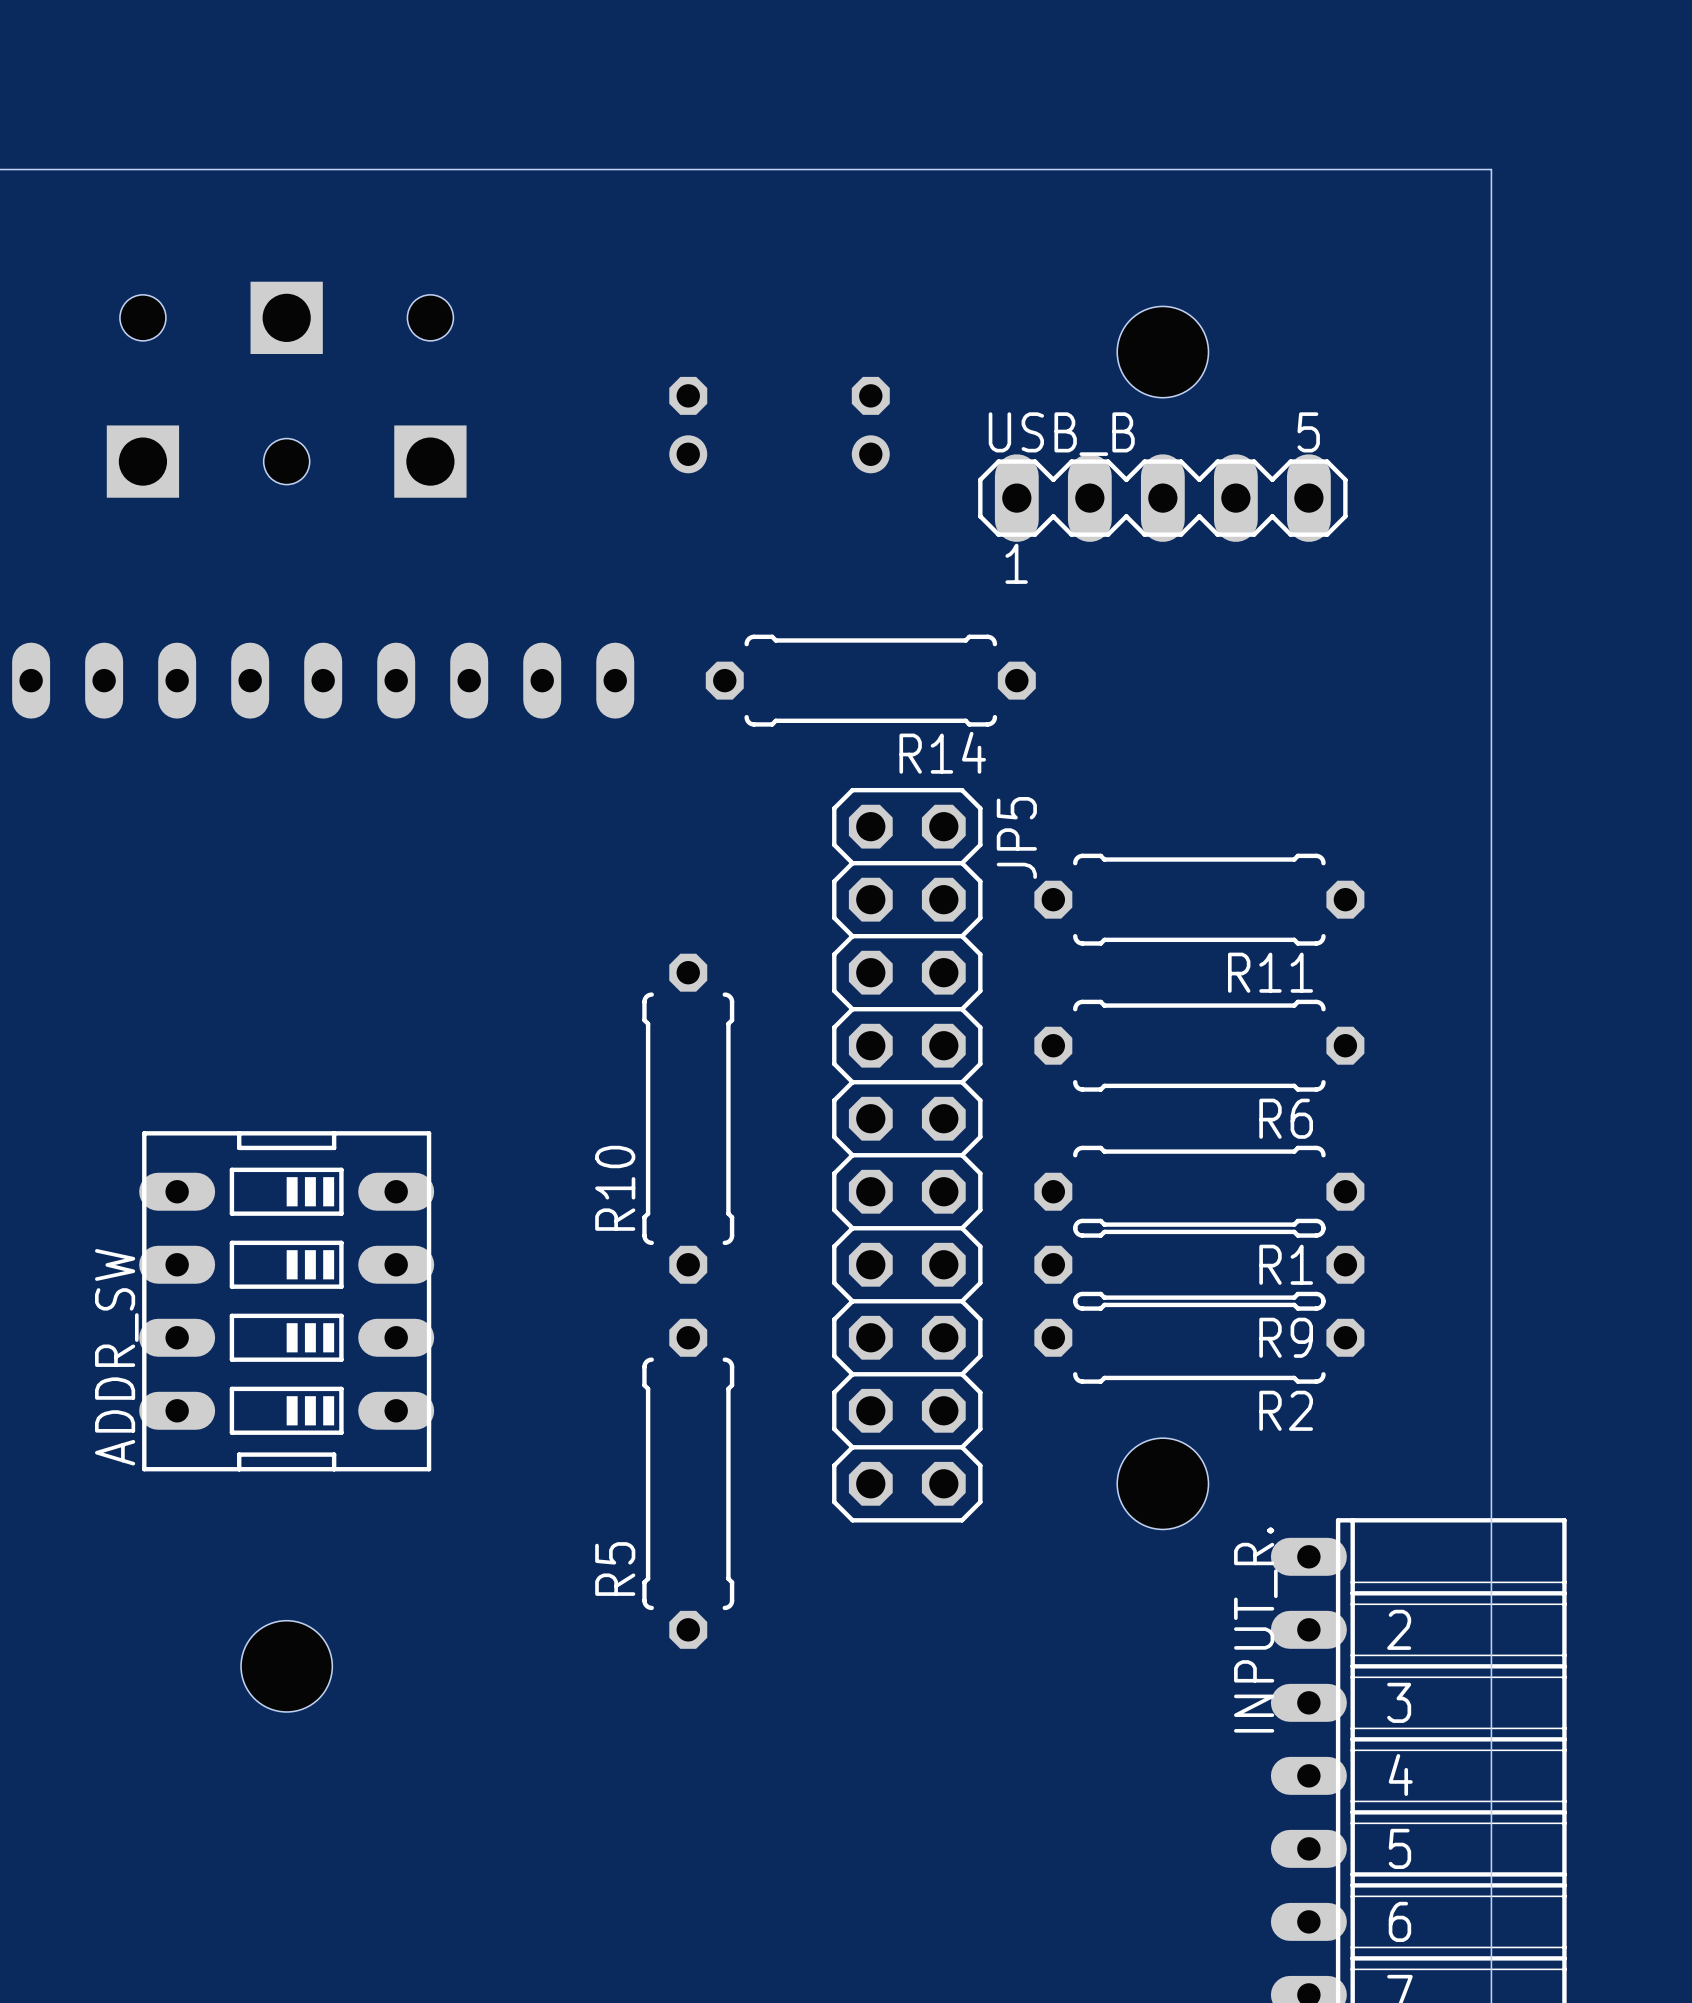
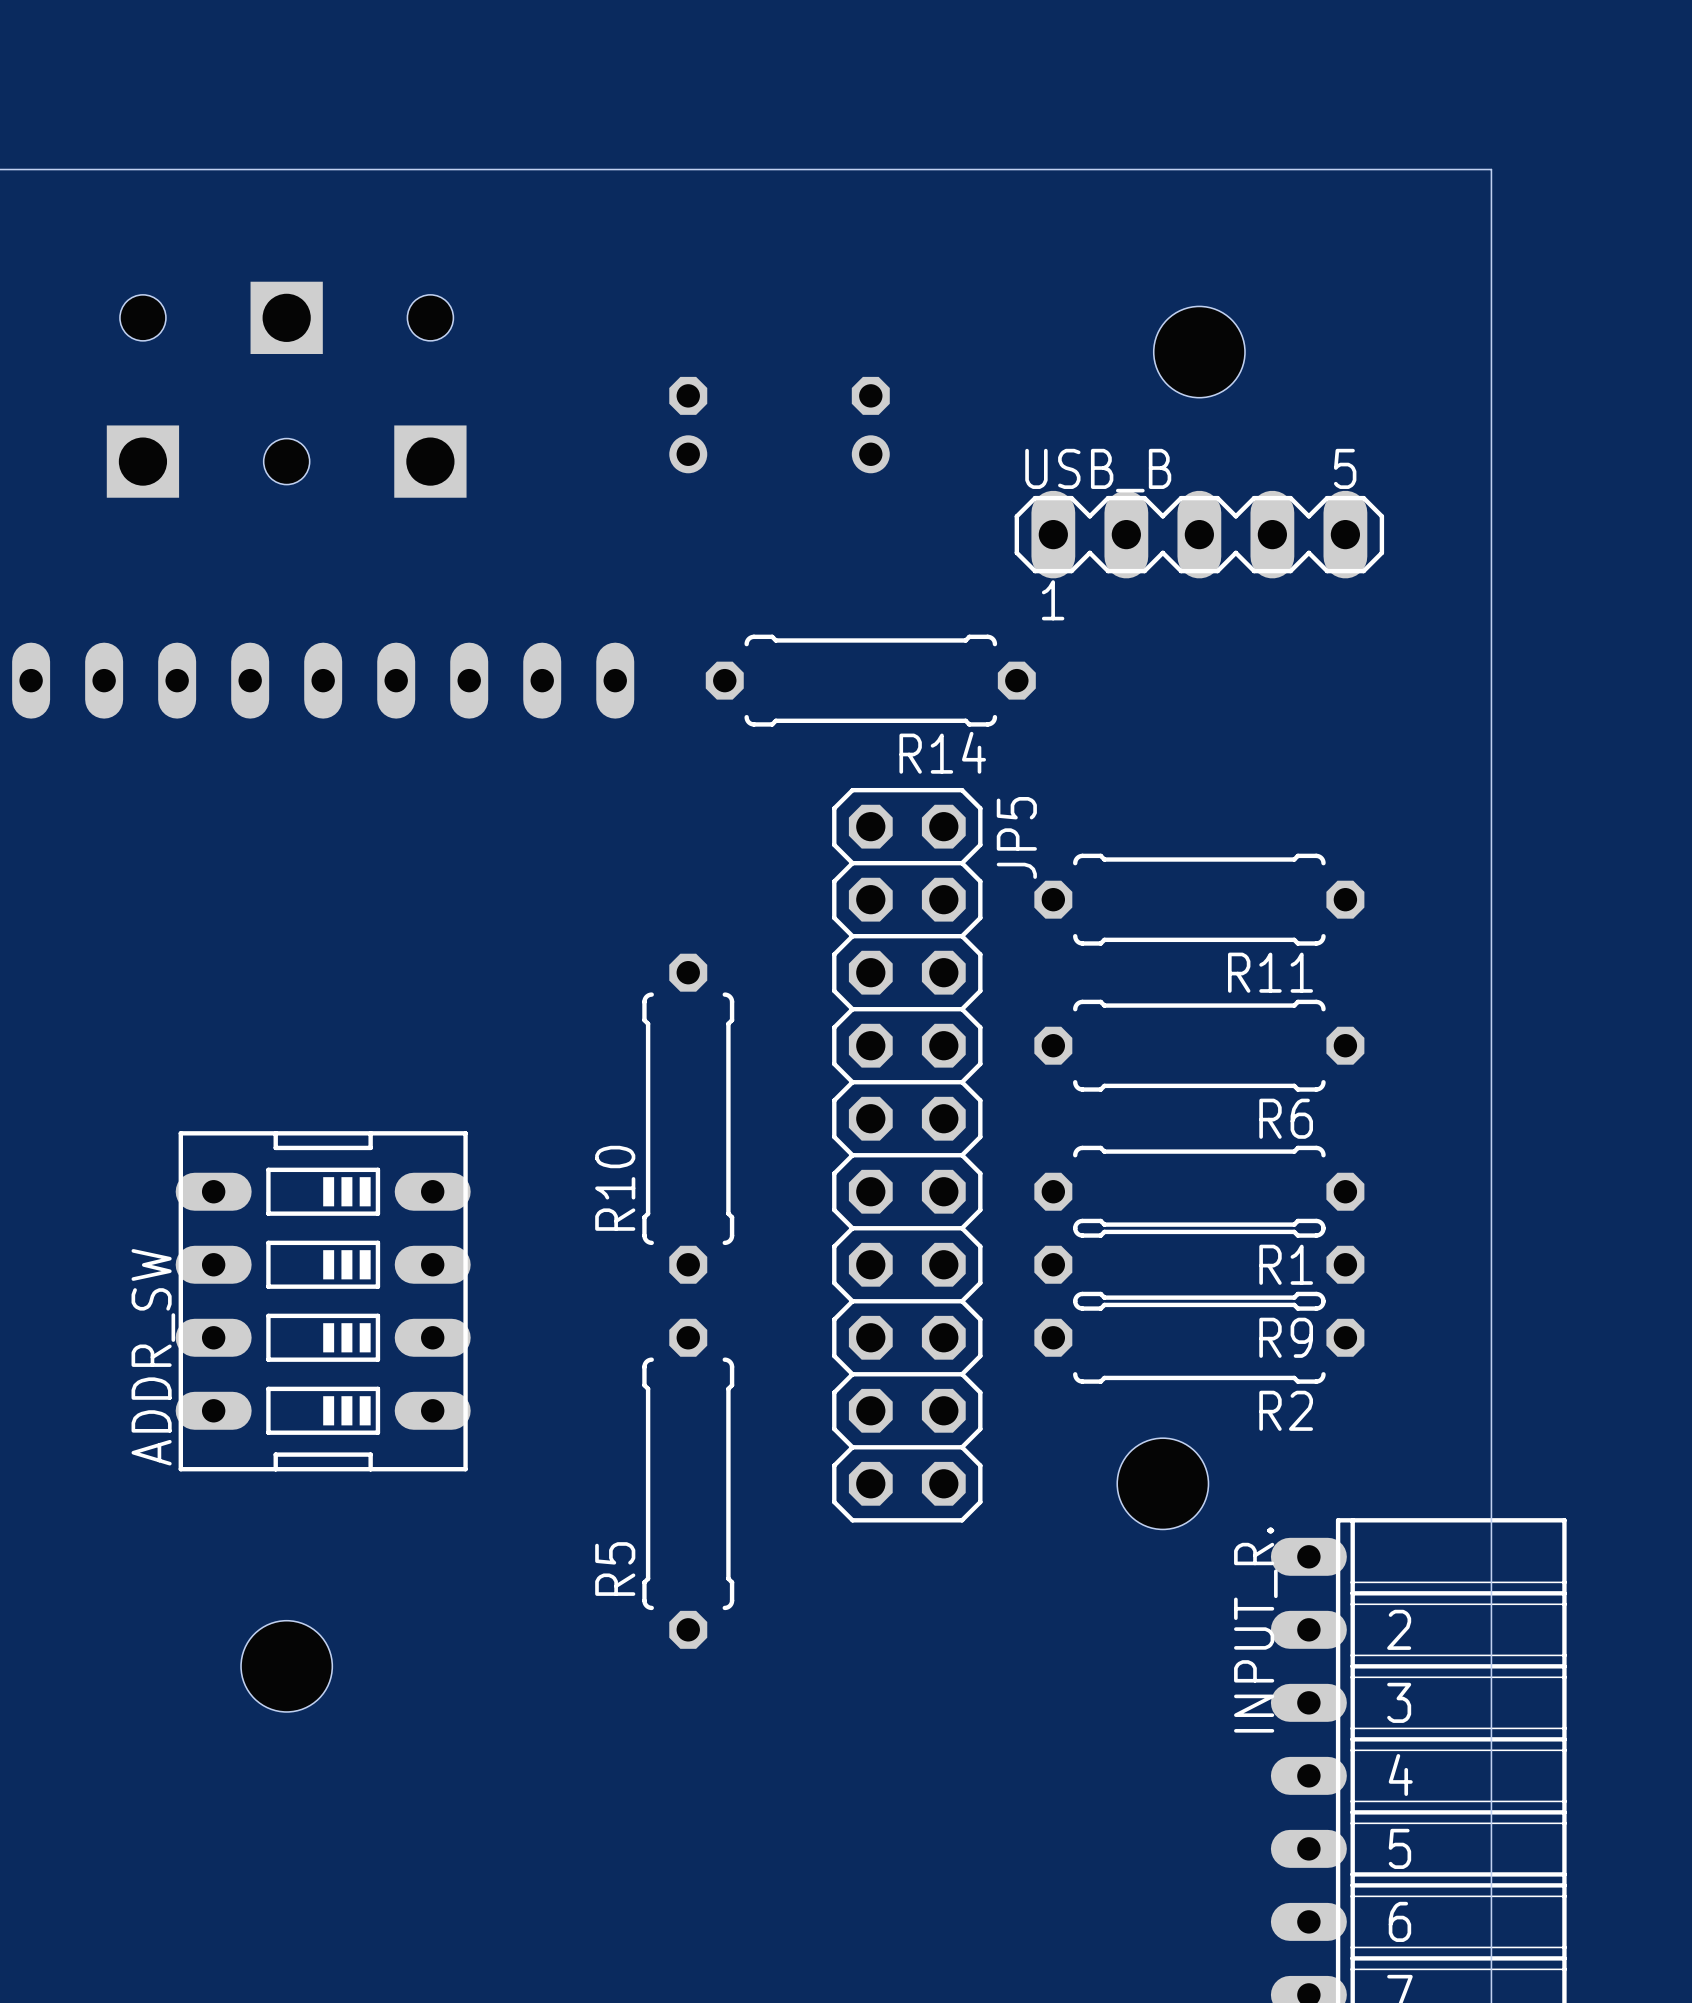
hole position: (1162, 352) -> (1199, 352)
USB_B position: (1162, 498) -> (1199, 534)
ADDR_SW position: (286, 1301) -> (323, 1301)

